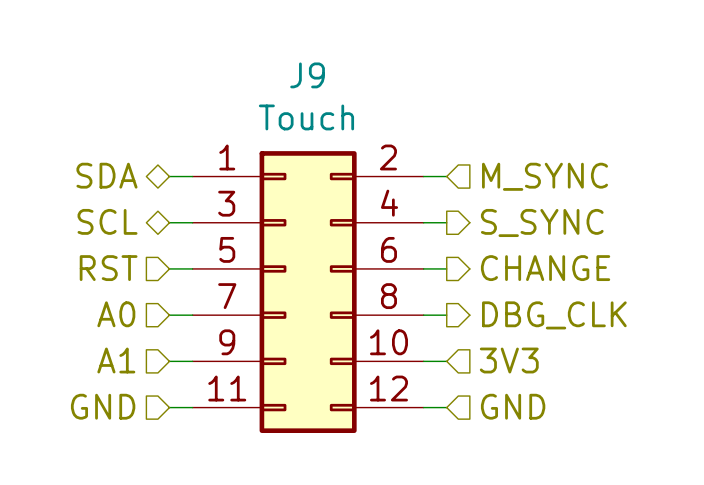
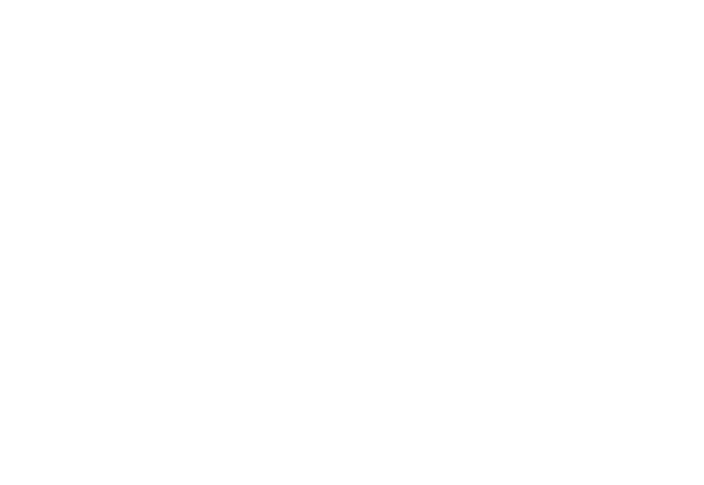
hierarchical label: SDA (106, 175) -> none
wire: (169, 176) (192, 176) -> none
wire: (423, 176) (446, 176) -> none
hierarchical label: M_SYNC (545, 176) -> none
hierarchical label: SCL (107, 221) -> none
wire: (169, 222) (192, 222) -> none
wire: (423, 222) (446, 222) -> none
hierarchical label: S_SYNC (542, 222) -> none
hierarchical label: RST (108, 268) -> none
wire: (169, 268) (192, 268) -> none
wire: (423, 268) (446, 268) -> none
hierarchical label: CHANGE (545, 268) -> none
J9: Touch (308, 292) -> none
hierarchical label: A0 (116, 314) -> none
wire: (169, 315) (192, 315) -> none
wire: (423, 315) (446, 315) -> none
hierarchical label: DBG_CLK (554, 315) -> none
hierarchical label: A1 (116, 360) -> none
hierarchical label: 3V3 (509, 360) -> none
wire: (169, 361) (192, 361) -> none
wire: (423, 361) (446, 361) -> none
hierarchical label: GND (103, 406) -> none
hierarchical label: GND (513, 406) -> none
wire: (169, 407) (192, 407) -> none
wire: (423, 407) (446, 407) -> none

